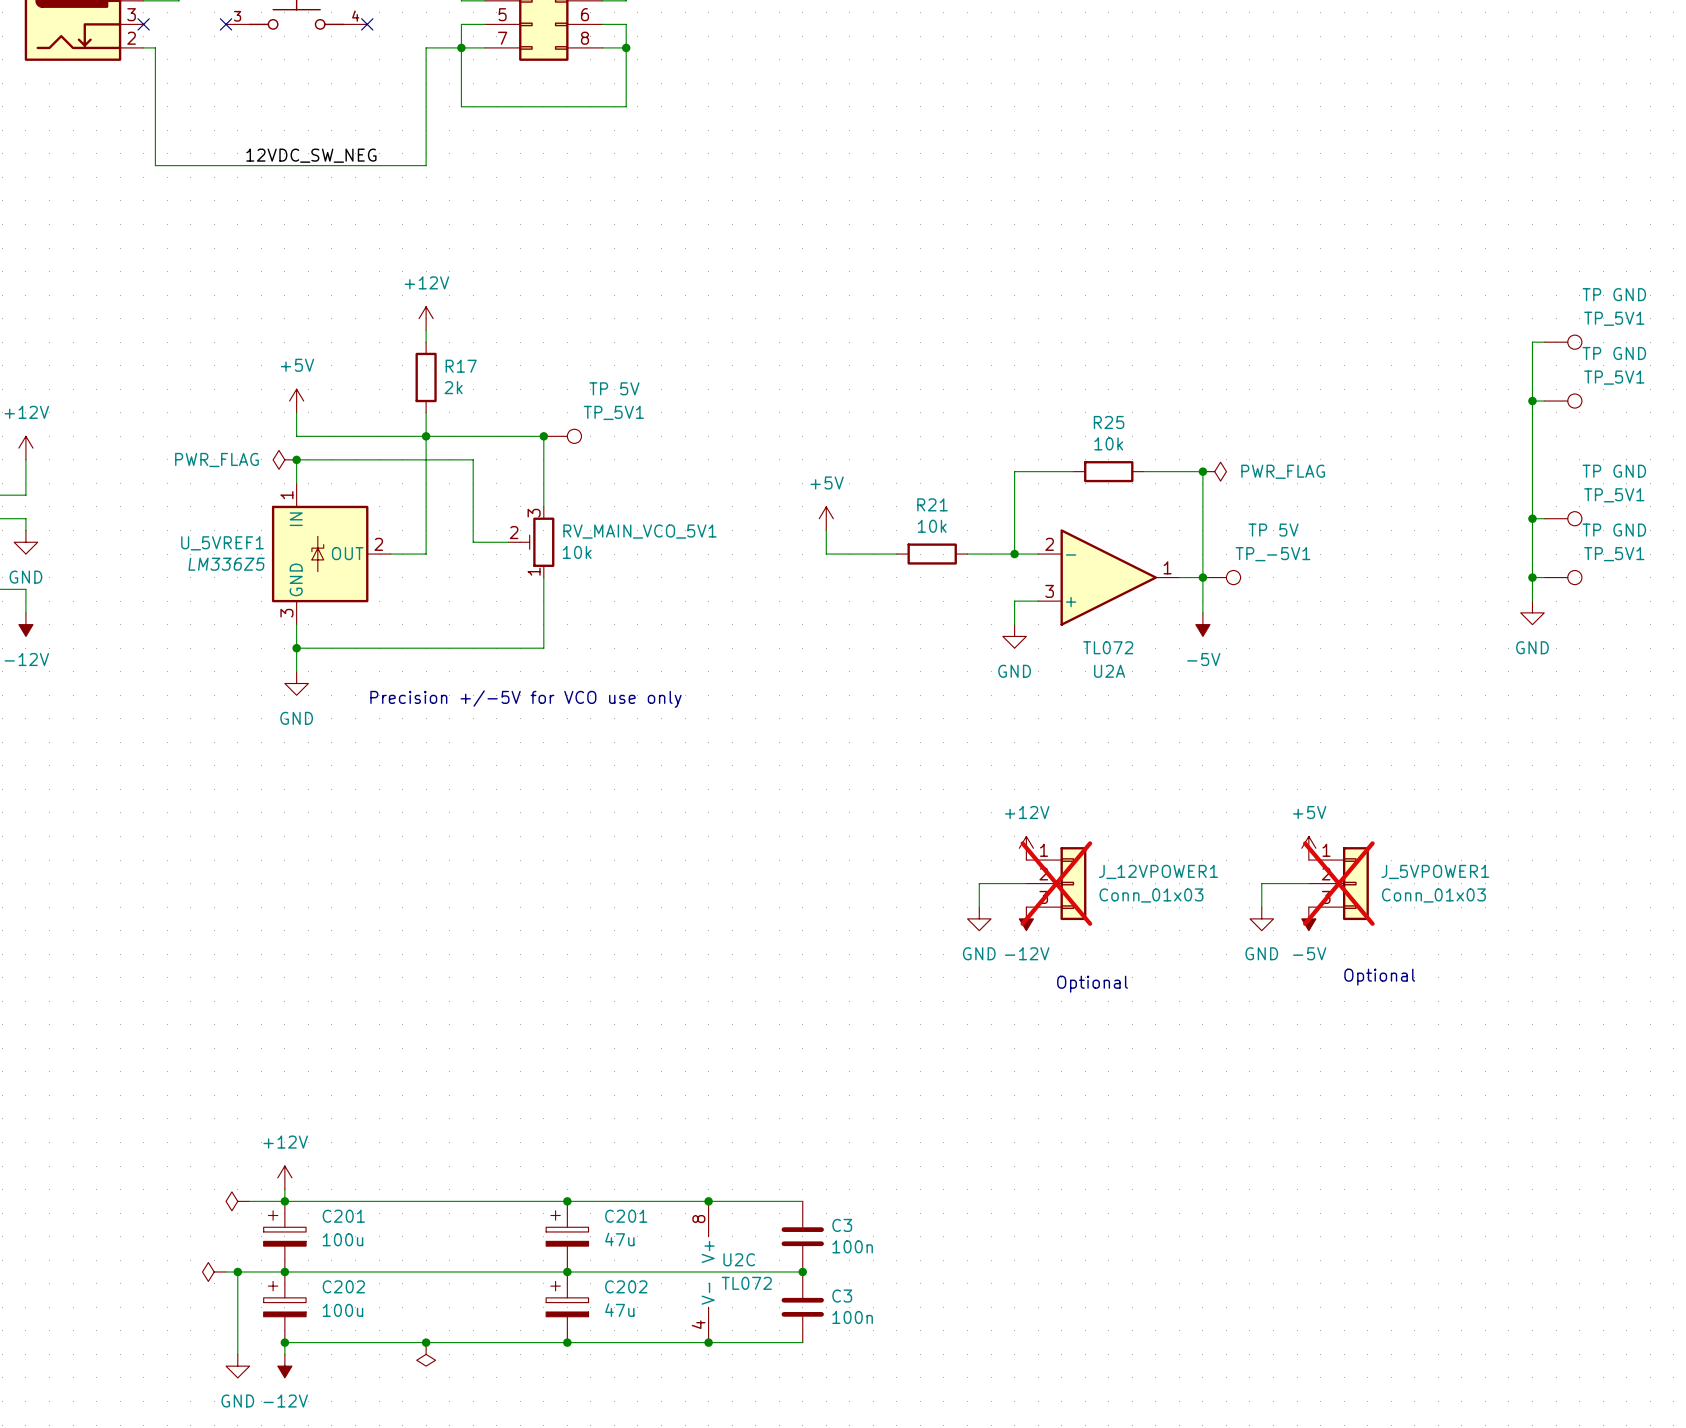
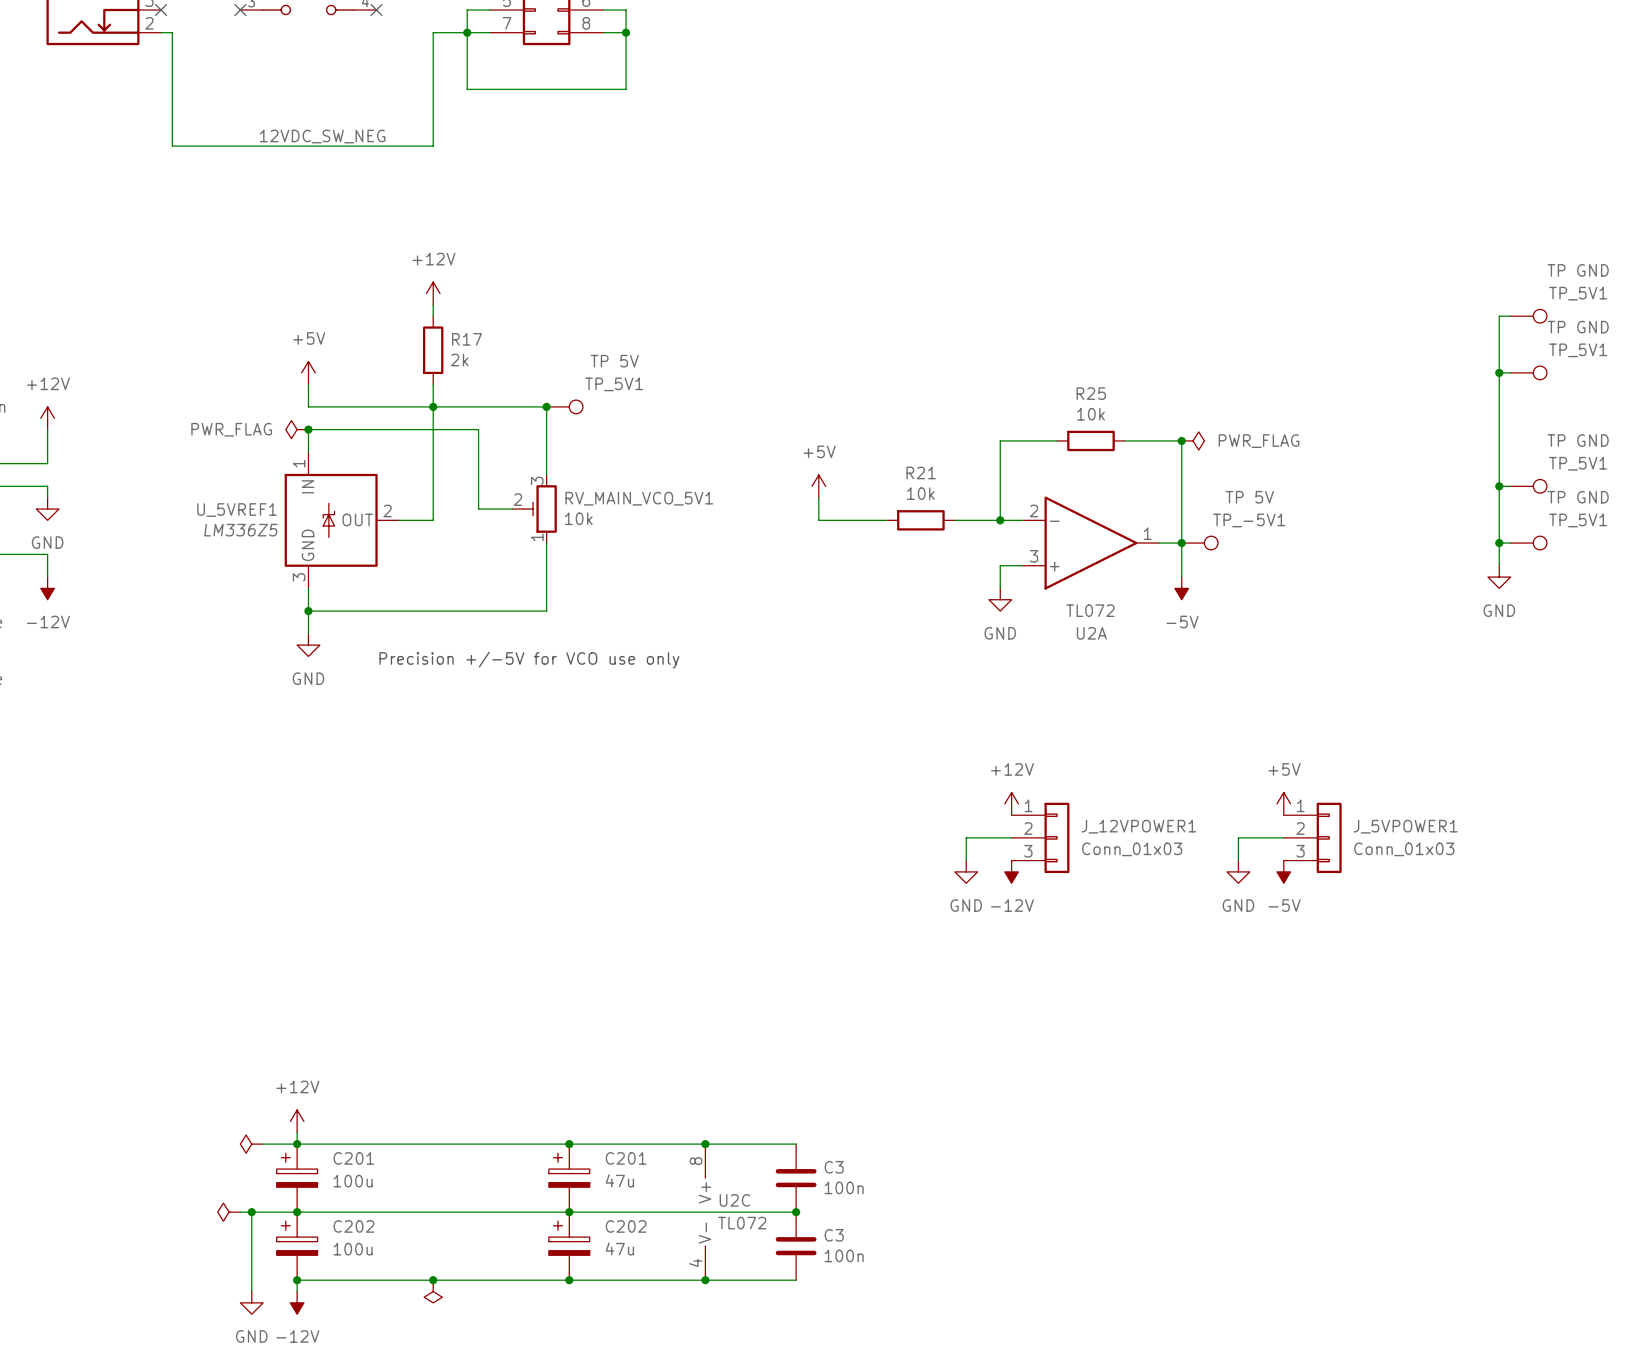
J_12VPOWER1 do-not-place cross: (1056, 883) -> none
J_5VPOWER1 do-not-place cross: (1338, 883) -> none
text: Optional (1379, 977) -> none
text: Optional (1092, 984) -> none

